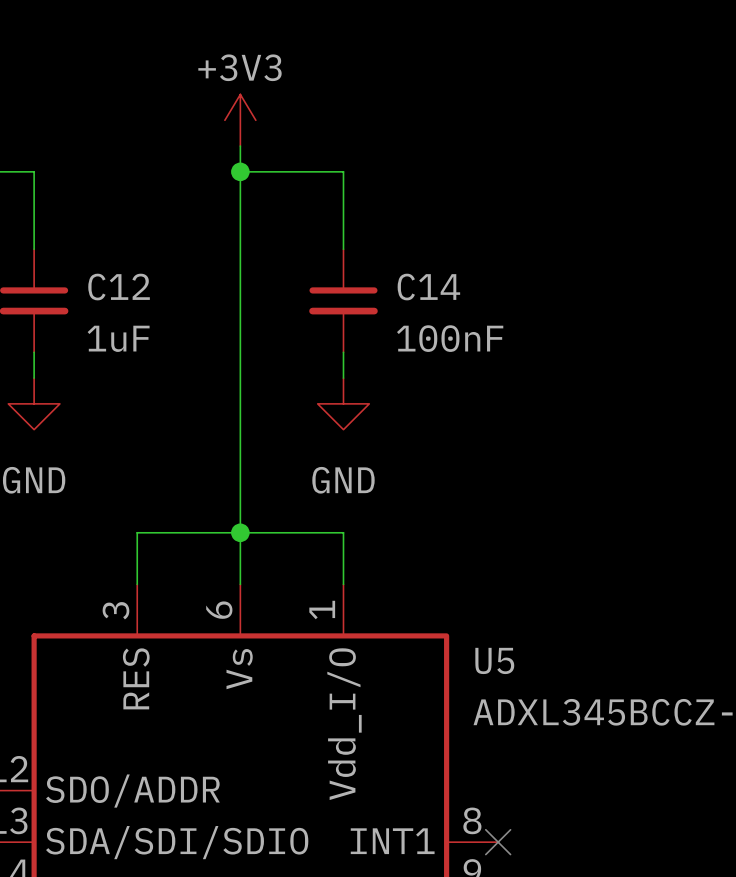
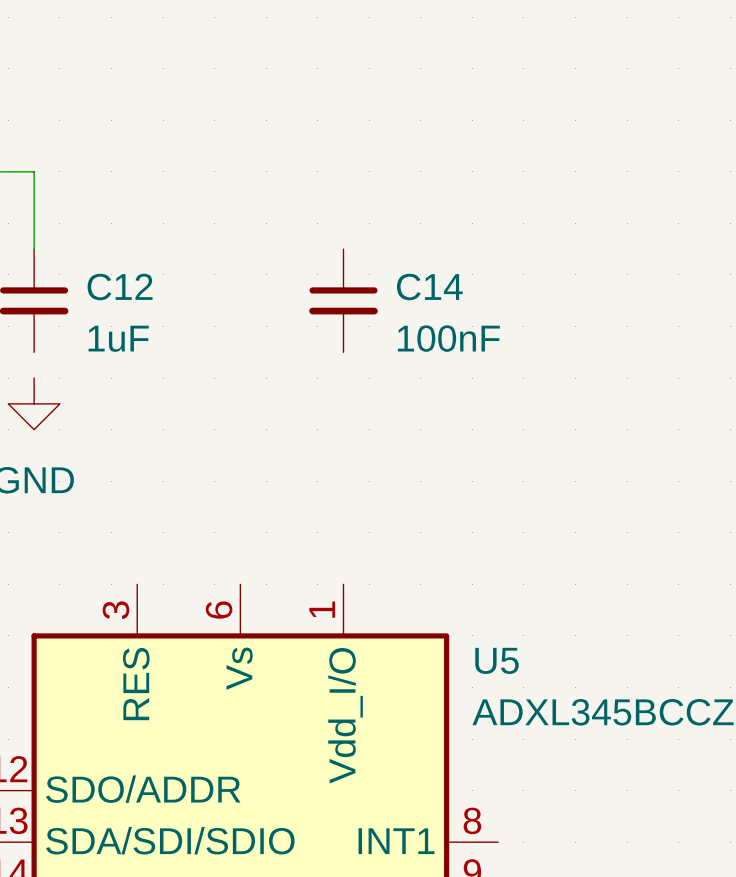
power symbol: +3V3 (240, 120) -> none
wire: (240, 146) (240, 584) -> none
wire: (240, 171) (343, 171) (343, 249) -> none
junction: (240, 171) -> none
wire: (34, 352) (34, 378) -> none
wire: (343, 352) (343, 378) -> none
power symbol: GND (343, 403) -> none
junction: (240, 532) -> none
wire: (137, 584) (137, 532) (343, 532) (343, 584) -> none
no-connect mark: (498, 842) -> none

